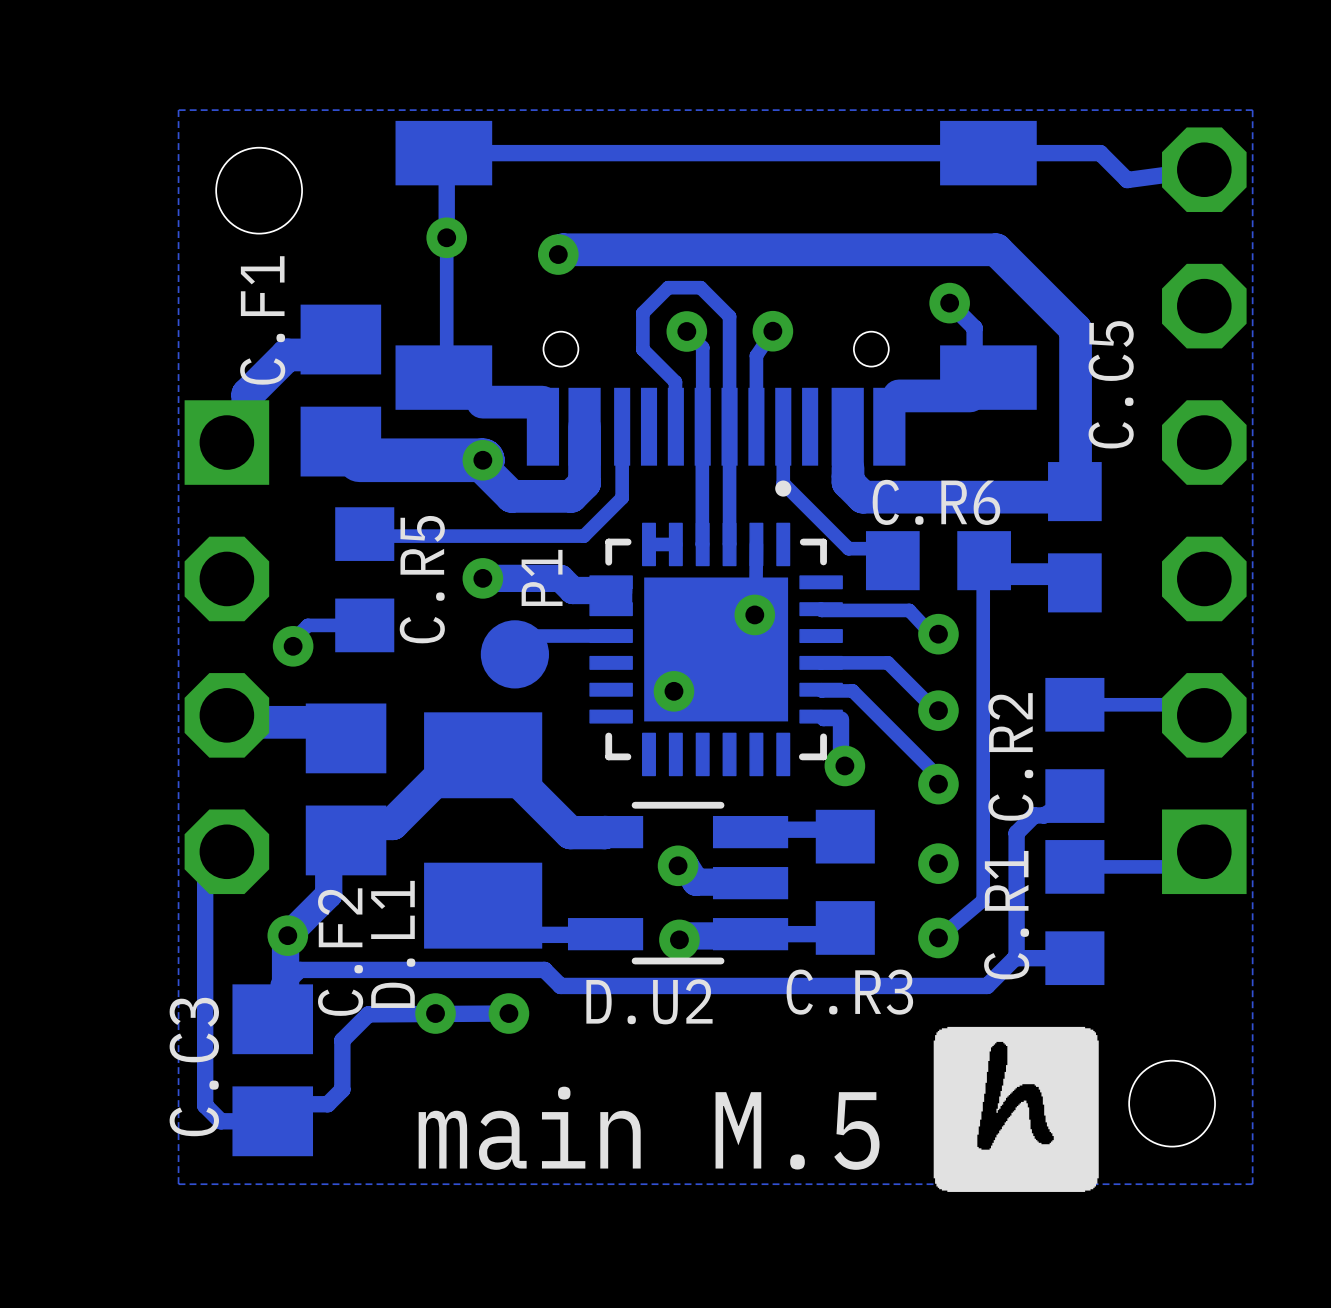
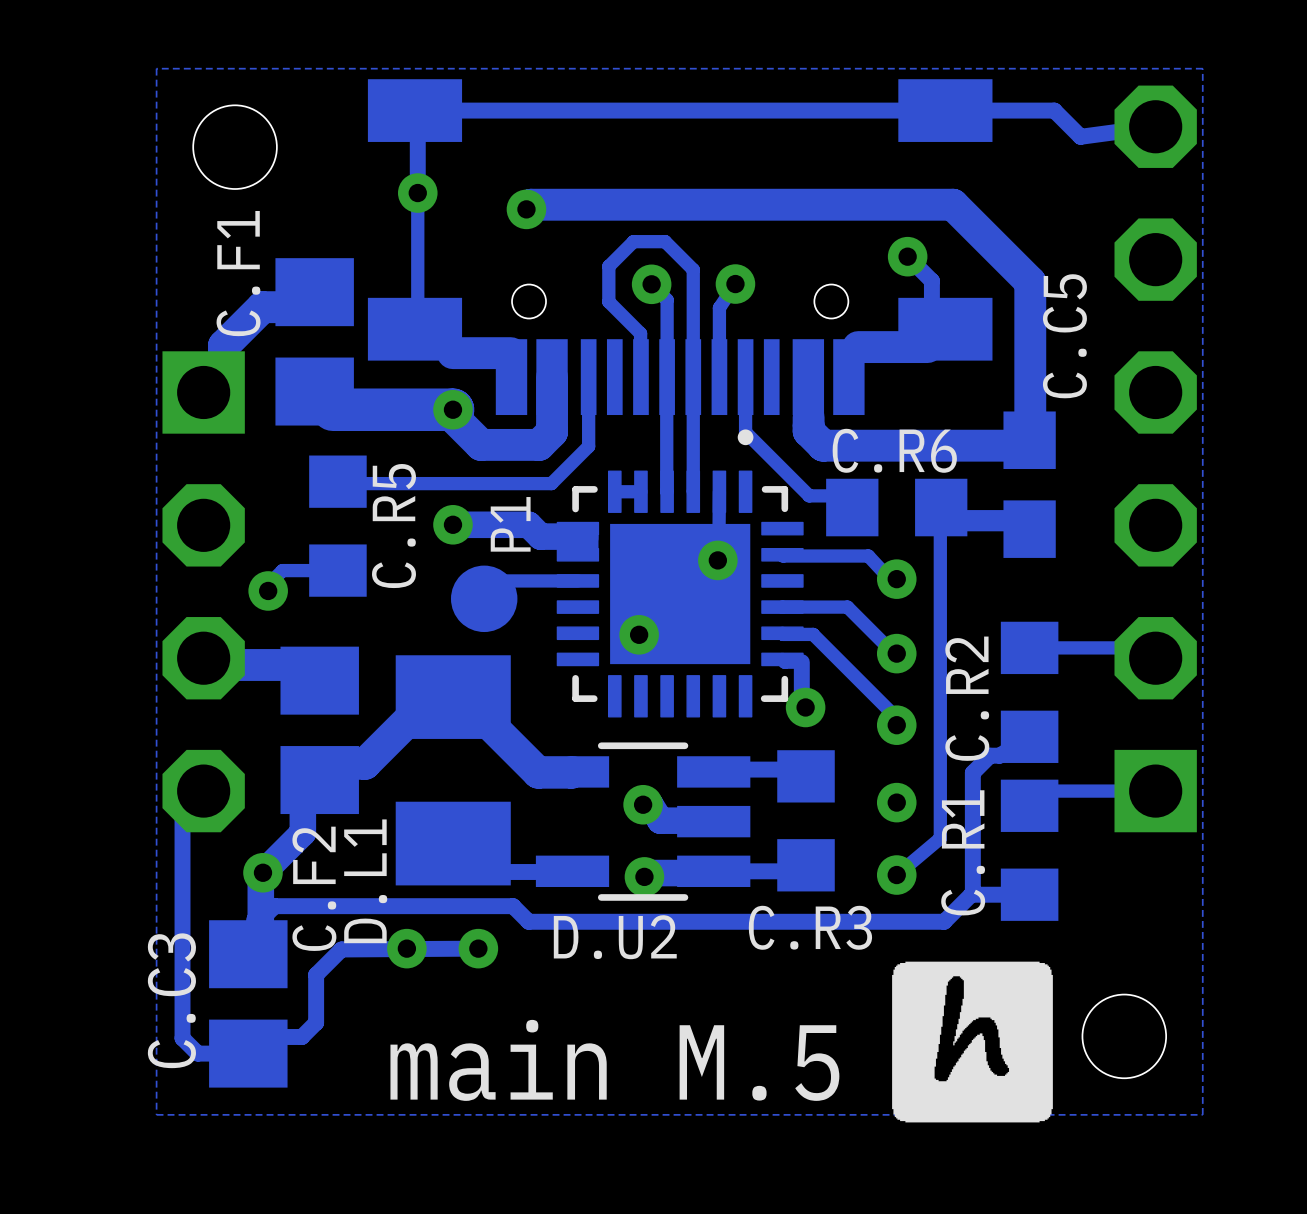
track: (1204, 851) (1186, 866) (1074, 866) -> (1155, 791) (1044, 791) (1029, 805)

